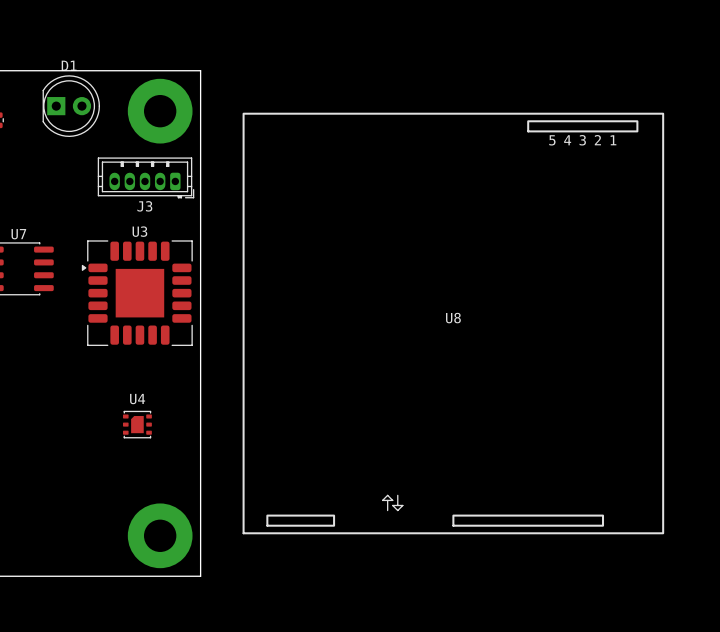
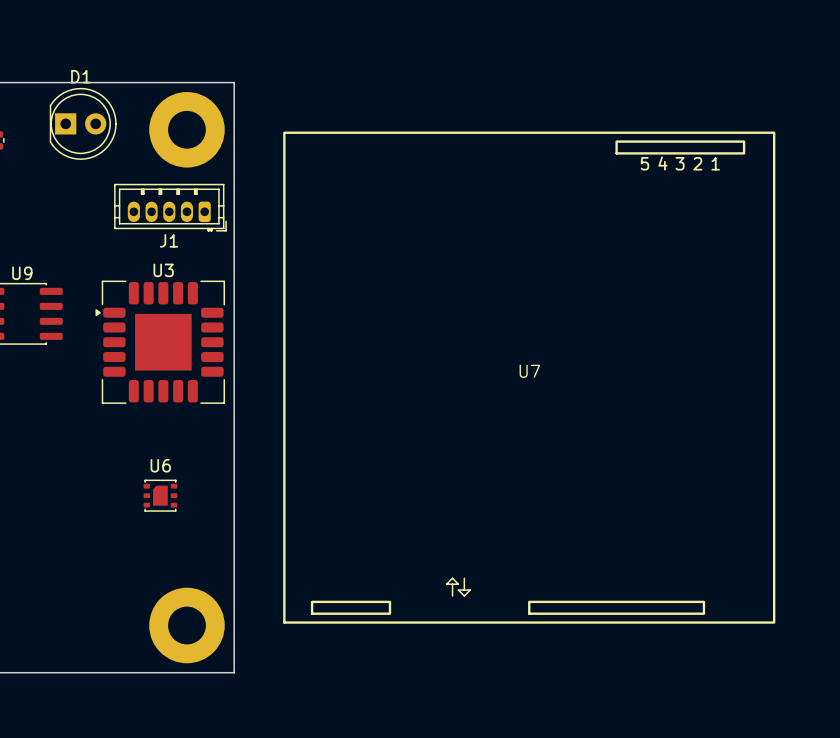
J3 name: J3 (144, 206) -> J1 (169, 240)
U7 name: U7 (18, 234) -> U9 (22, 273)
U8 name: U8 (453, 318) -> U7 (529, 371)
U4 name: U4 (137, 399) -> U6 (160, 465)

